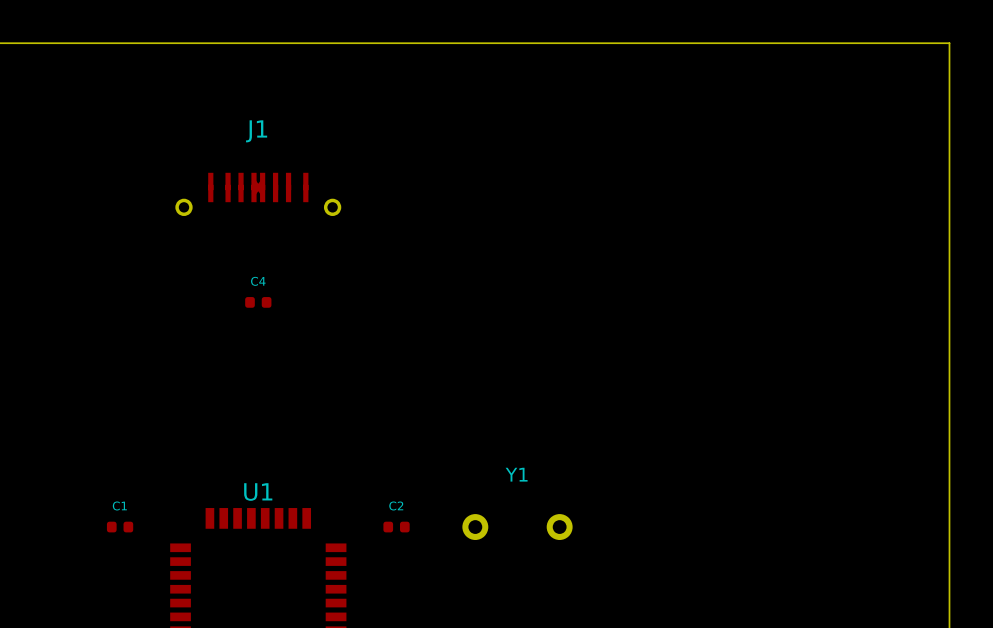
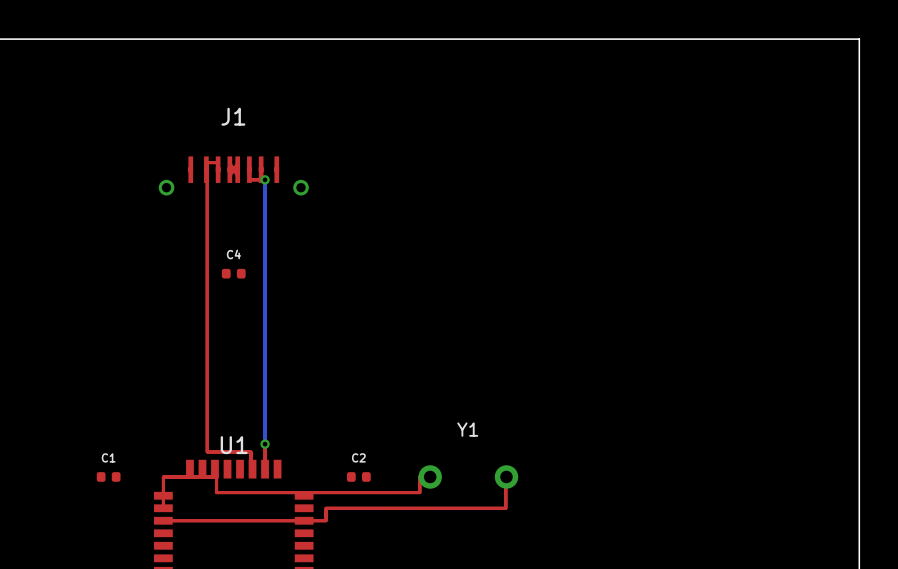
top track: none -> (218, 164) (218, 162) (207, 162) (207, 451) (250, 451) (250, 469) (252, 469)
top track: none -> (249, 179) (265, 179)
bottom track: none -> (265, 179) (265, 444)
via: none -> (265, 179)
top track: none -> (265, 444) (265, 469)
via: none -> (265, 444)
top track: none -> (430, 476) (419, 476) (419, 492) (216, 492) (216, 476) (163, 476) (163, 508)
top track: none -> (506, 476) (505, 508) (326, 508) (326, 520) (163, 520)

